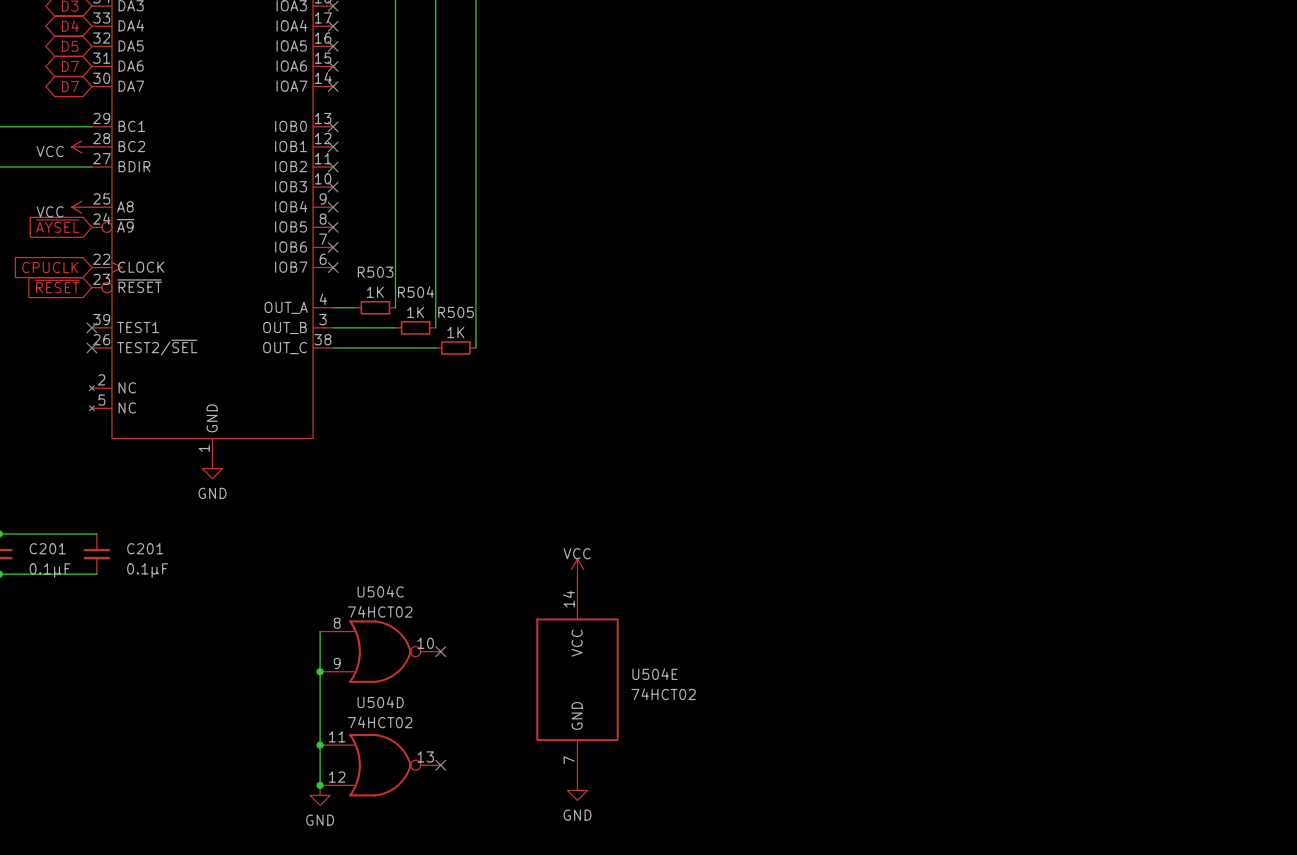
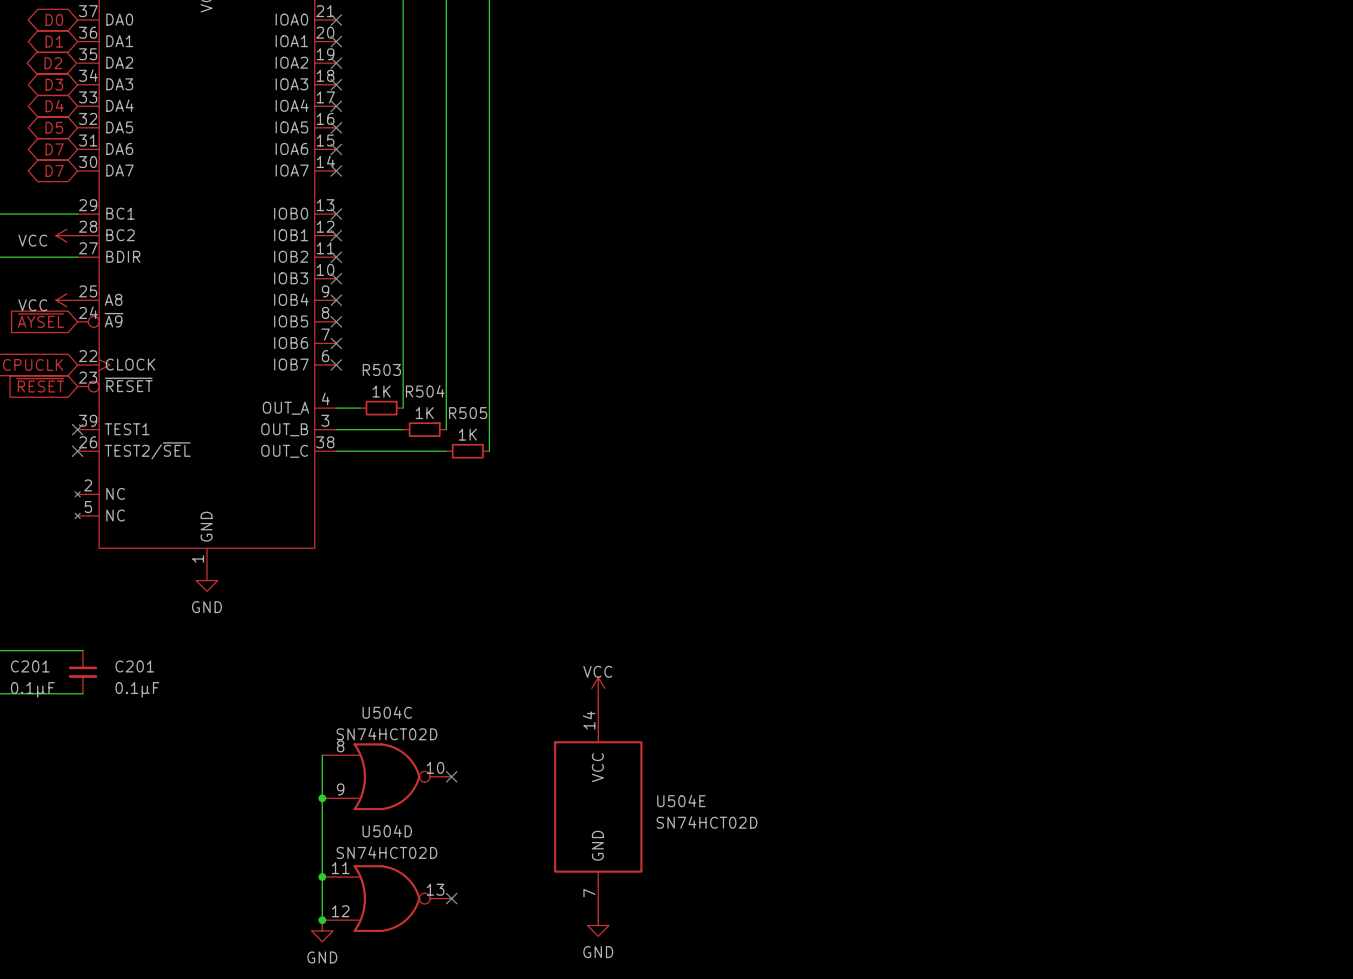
U504C value: 74HCT02 (380, 611) -> SN74HCT02D (386, 734)
U504E value: 74HCT02 (663, 694) -> SN74HCT02D (707, 822)
U504D value: 74HCT02 (380, 722) -> SN74HCT02D (386, 852)

